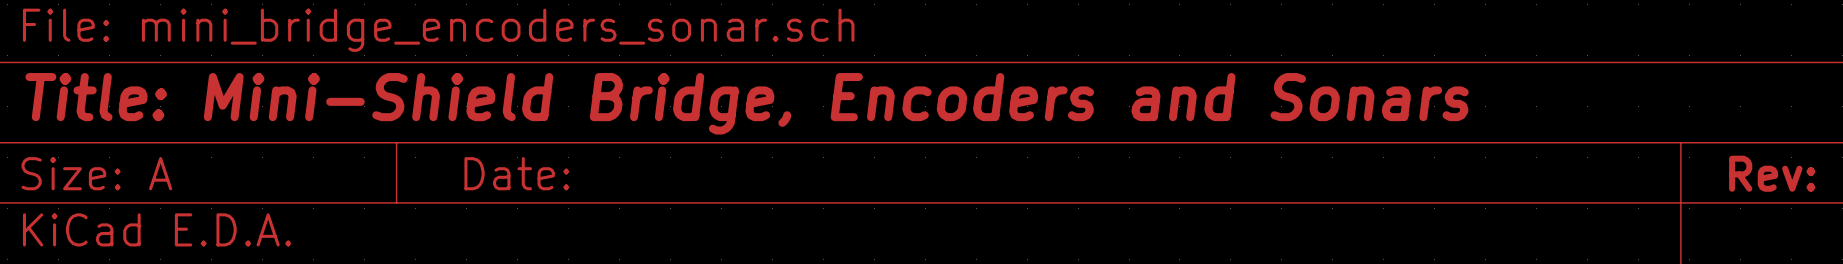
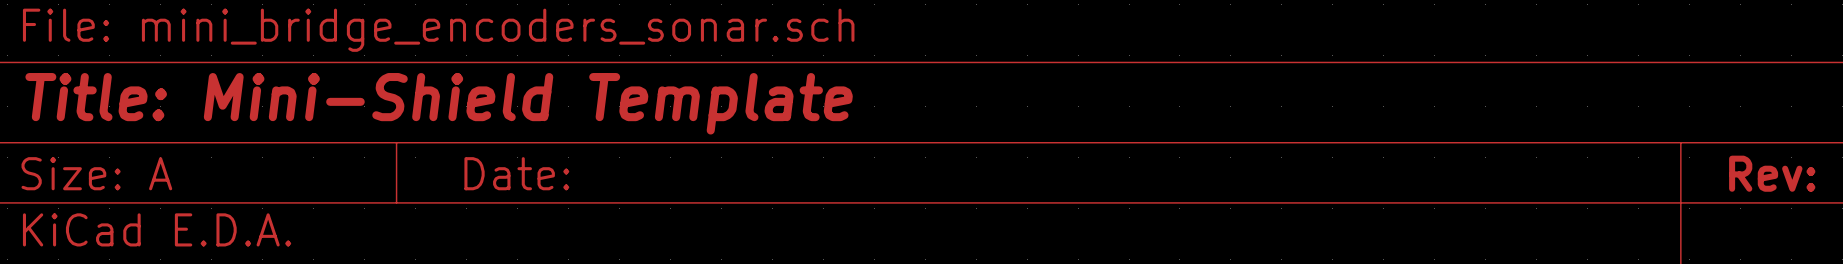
title block: Title: Mini-Shield Bridge, Encoders and Sonars (747, 103) -> Title: Mini-Shield Template (439, 103)

